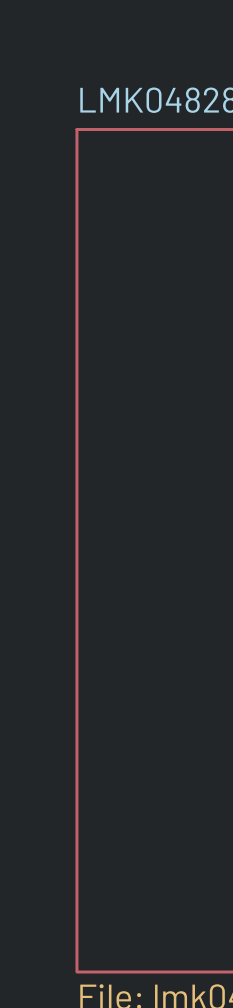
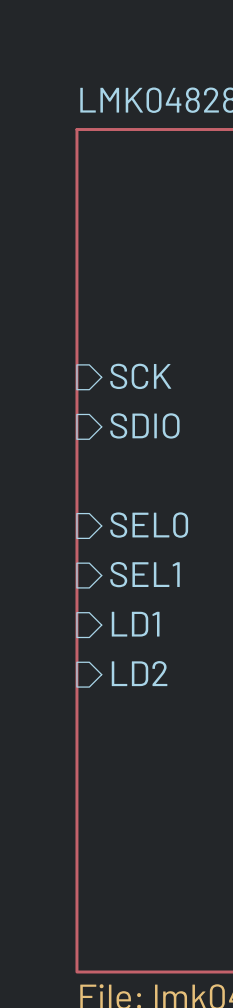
sheet pin: none -> SCK (140, 376)
sheet pin: none -> SDIO (144, 425)
sheet pin: none -> SEL0 (149, 525)
sheet pin: none -> SEL1 (145, 574)
sheet pin: none -> LD1 (135, 624)
sheet pin: none -> LD2 (139, 673)

